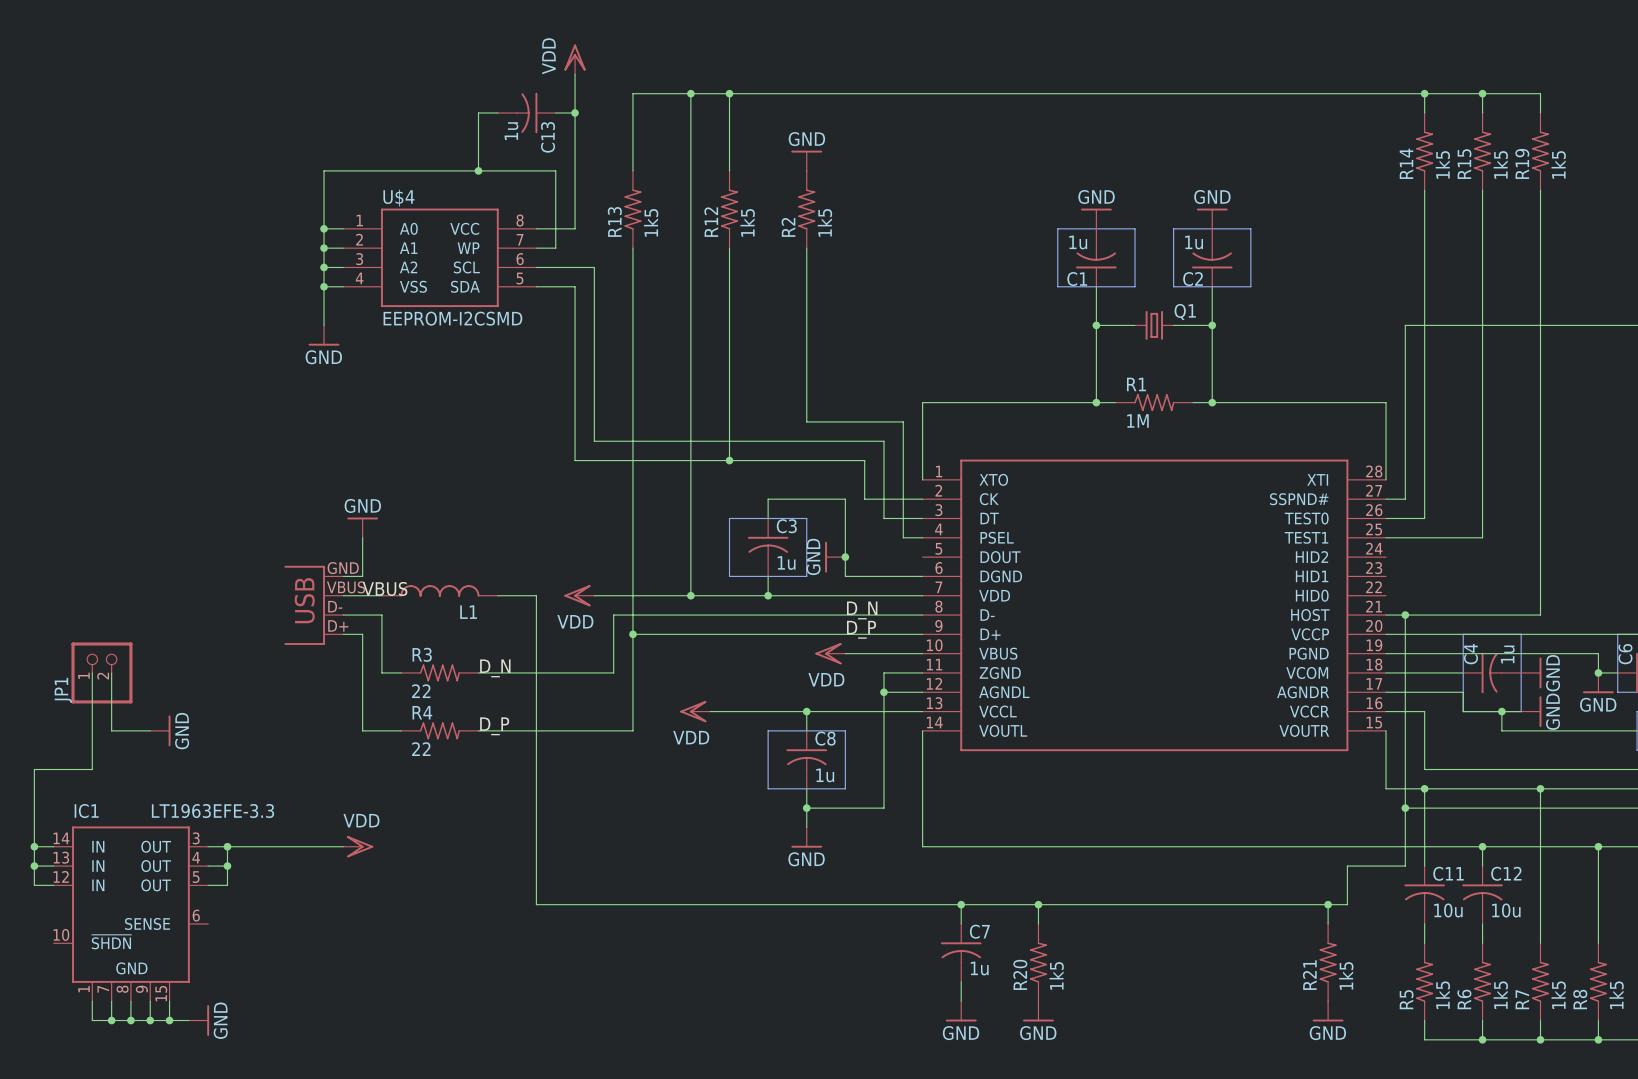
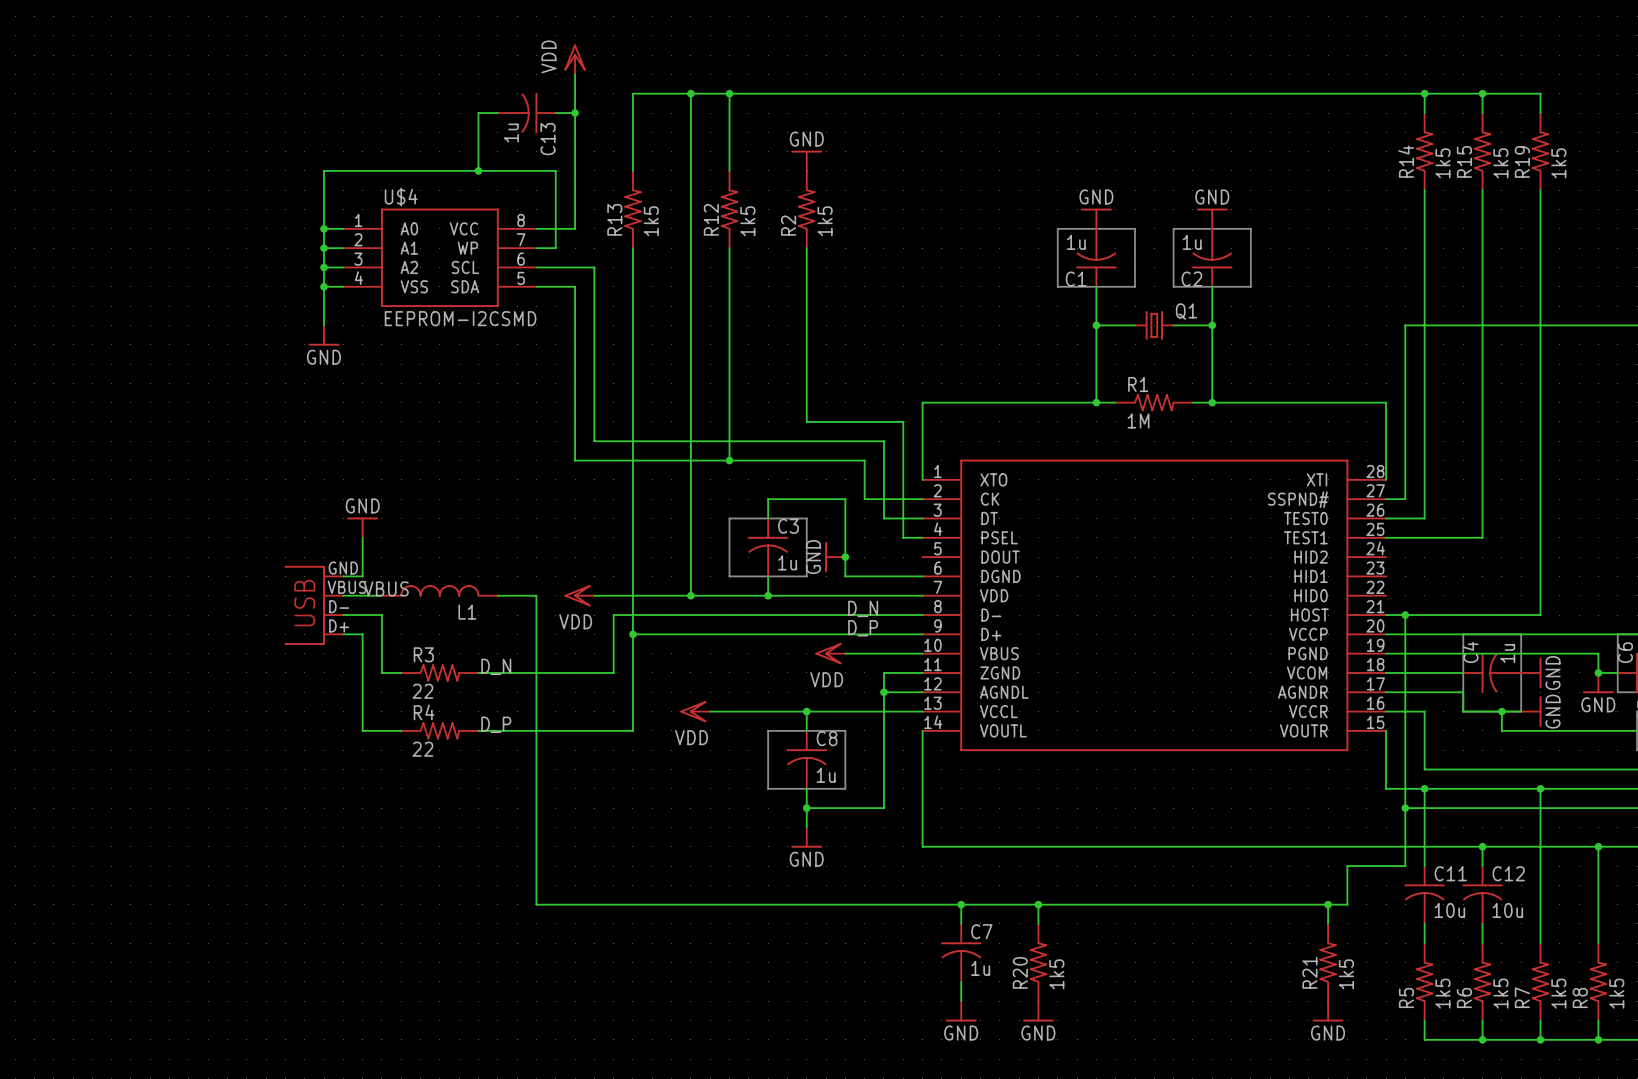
wire: (92, 672) (92, 769) (34, 769) (34, 885) (53, 885) -> none
JP1: (101, 672) -> none
wire: (111, 672) (111, 730) (150, 730) -> none
power symbol: GND (160, 730) -> none
wire: (34, 846) (53, 846) -> none
junction: (34, 846) -> none
wire: (208, 846) (343, 846) -> none
wire: (227, 846) (227, 885) (208, 885) -> none
junction: (227, 846) -> none
power symbol: VDD (358, 846) -> none
wire: (34, 866) (53, 866) -> none
junction: (34, 866) -> none
wire: (208, 866) (227, 866) -> none
junction: (227, 866) -> none
IC1: LT1963EFE-3.3 (130, 913) -> none
wire: (92, 1001) (92, 1020) (188, 1020) -> none
wire: (111, 1001) (111, 1020) -> none
wire: (130, 1001) (130, 1020) -> none
wire: (150, 1001) (150, 1020) -> none
wire: (169, 1001) (169, 1020) -> none
junction: (111, 1020) -> none
junction: (130, 1020) -> none
junction: (150, 1020) -> none
junction: (169, 1020) -> none
power symbol: GND (199, 1020) -> none

